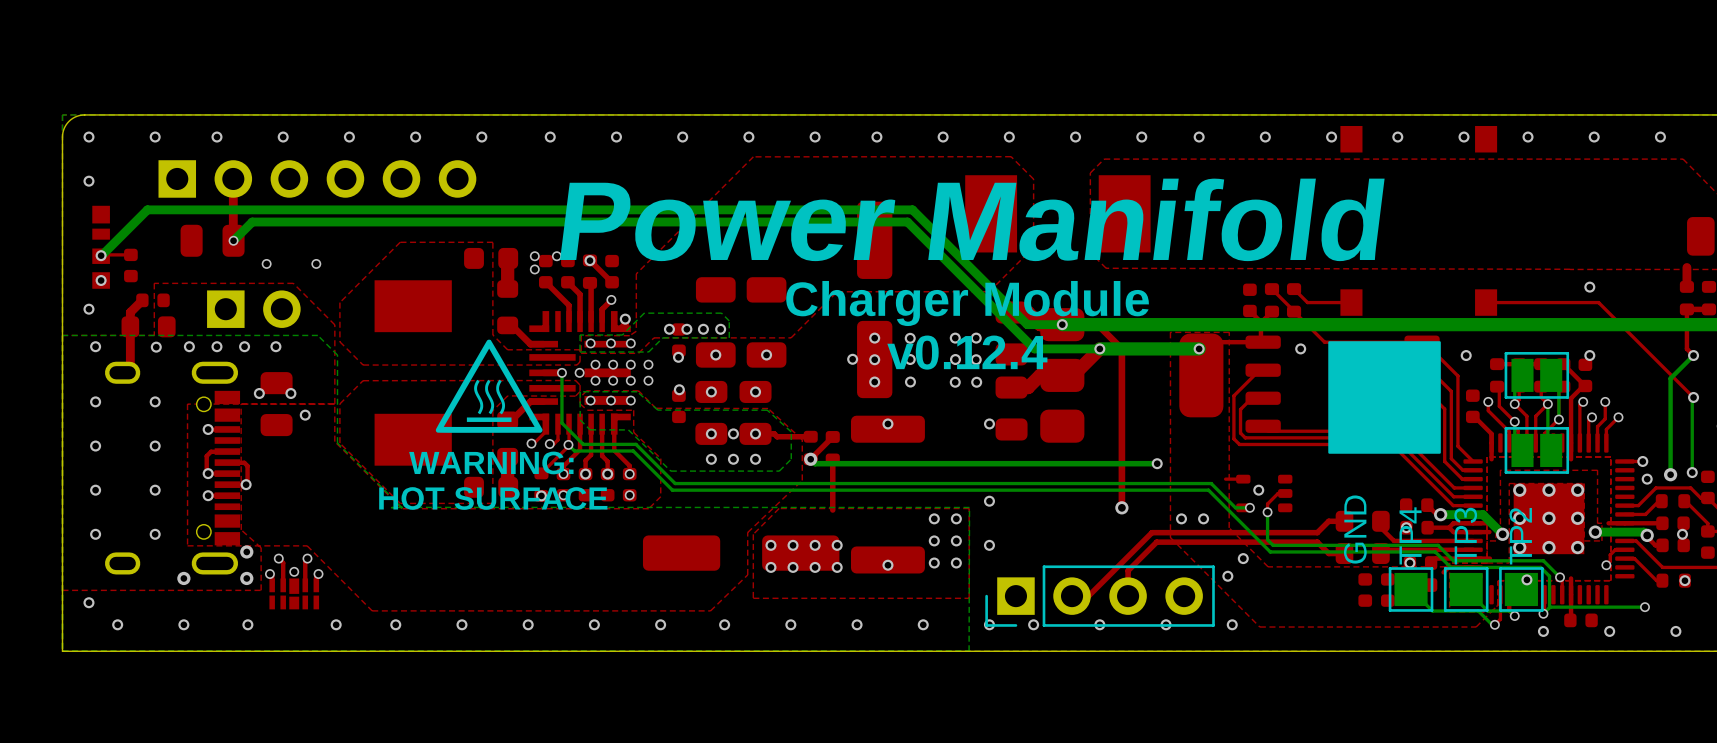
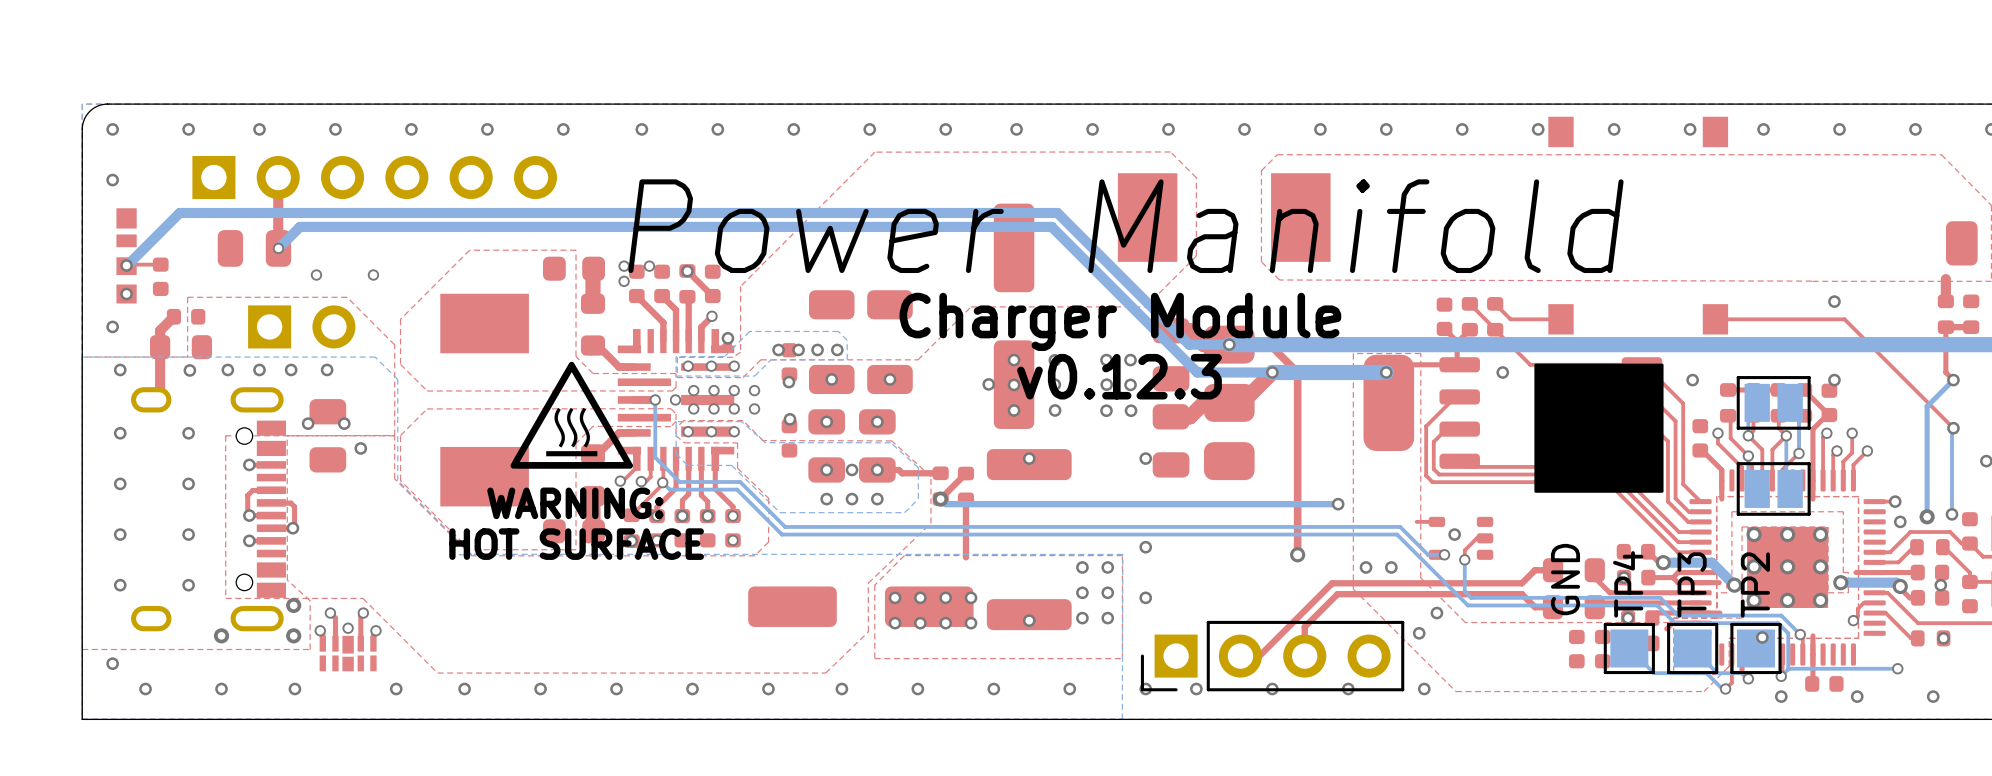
text: v0.12.4 (967, 352) -> v0.12.3 (1119, 376)

